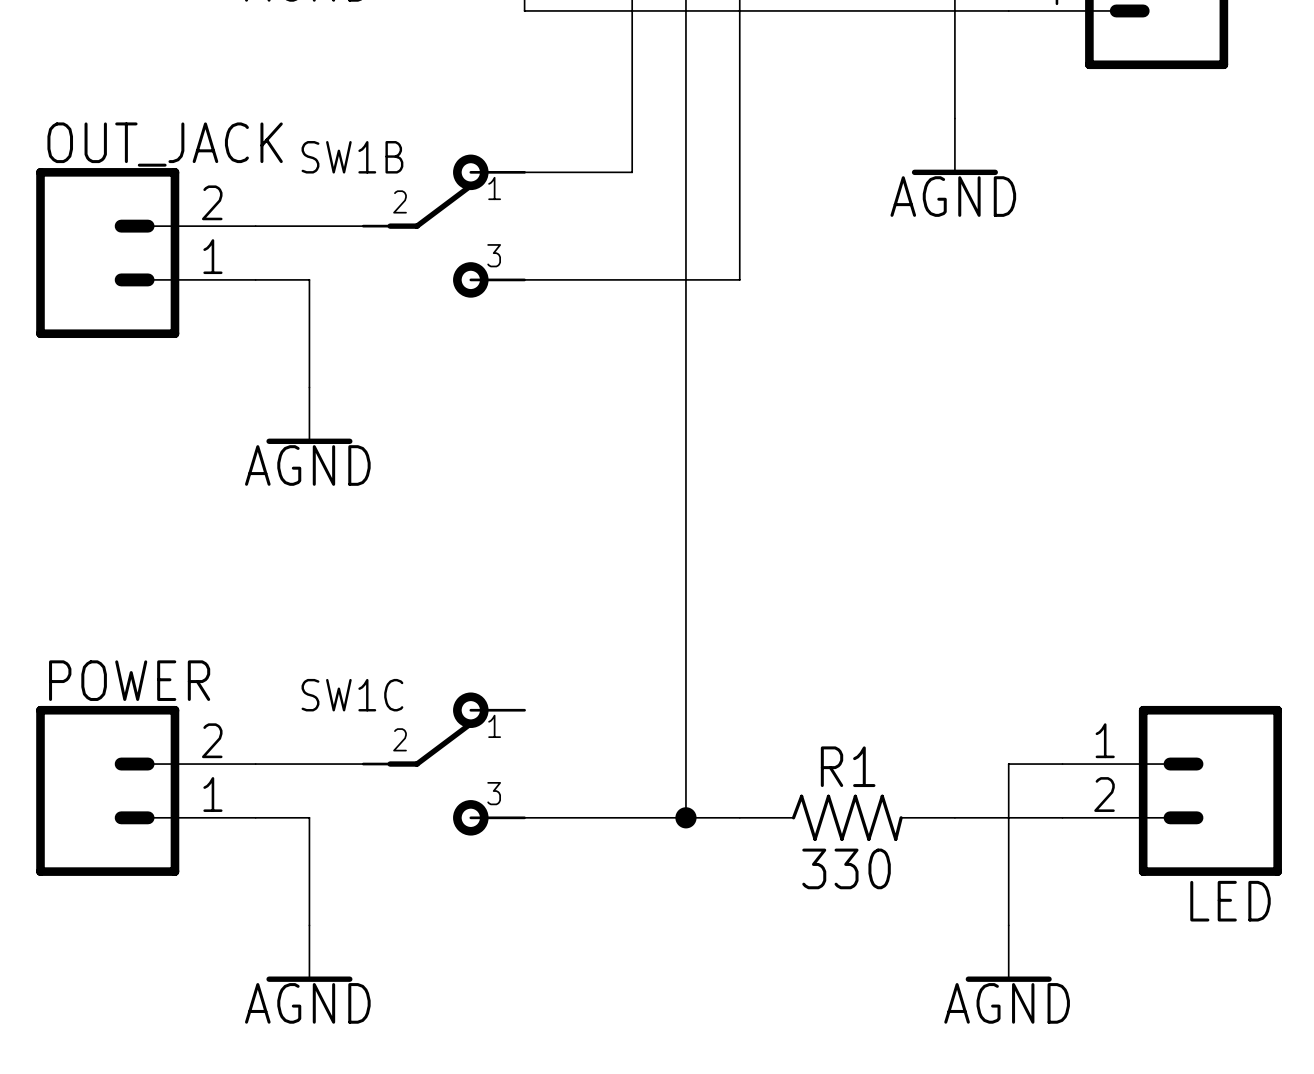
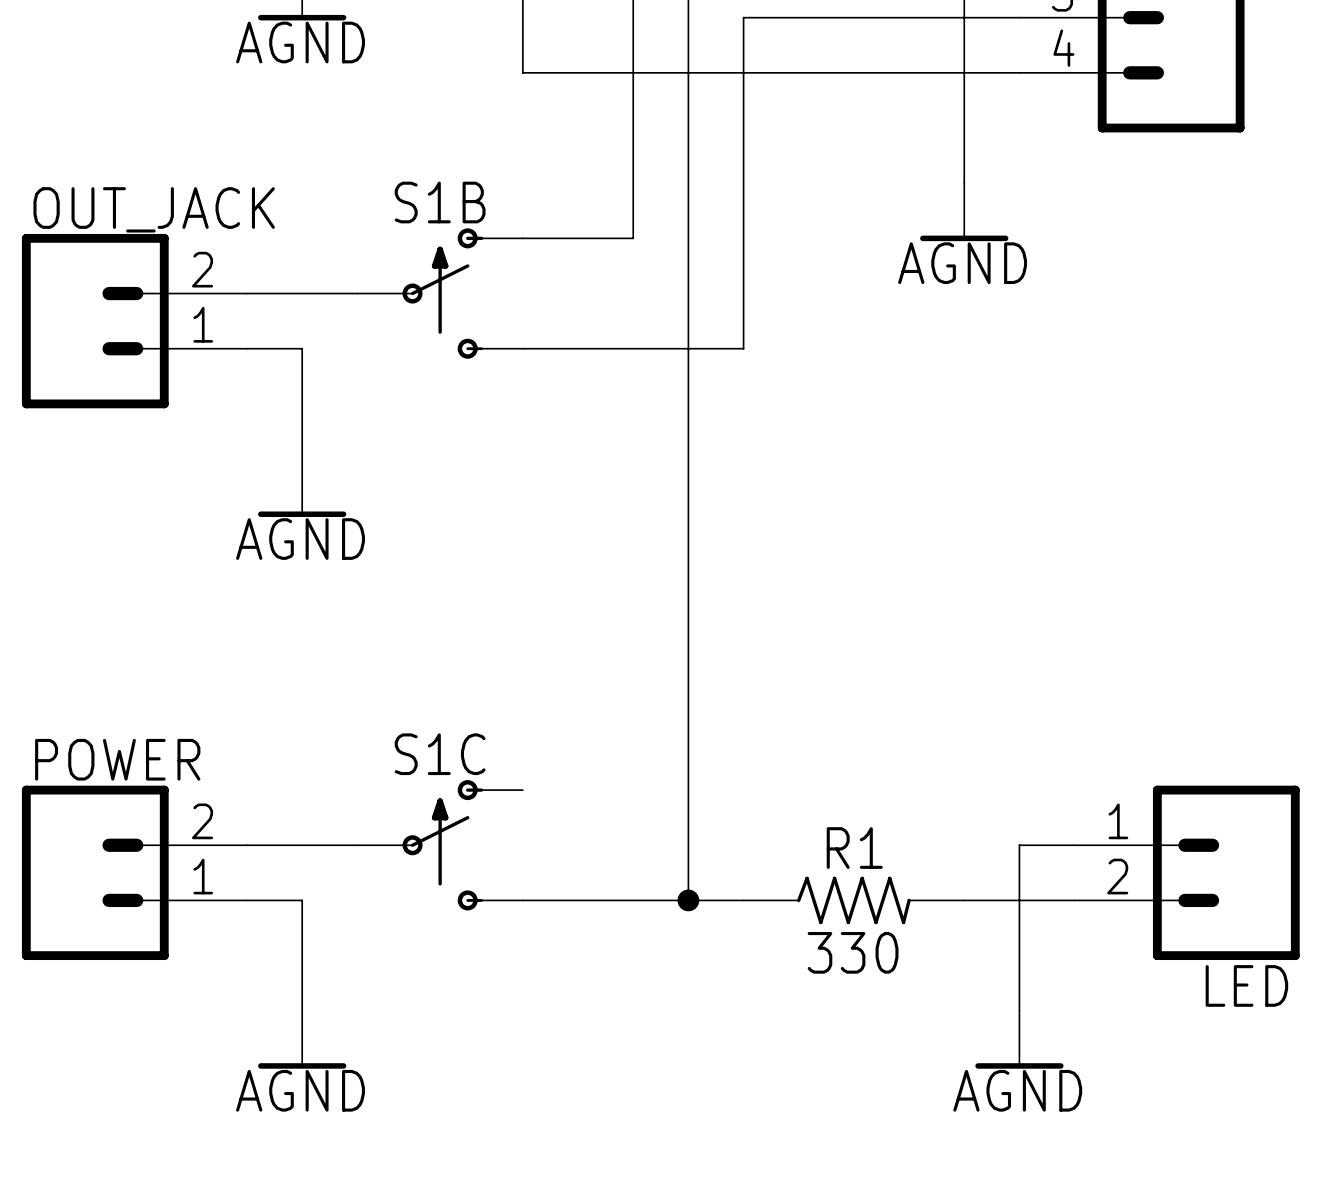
SW1B: (443, 226) -> none
S1B: none -> (440, 293)
SW1C: (443, 764) -> none
S1C: none -> (440, 845)

